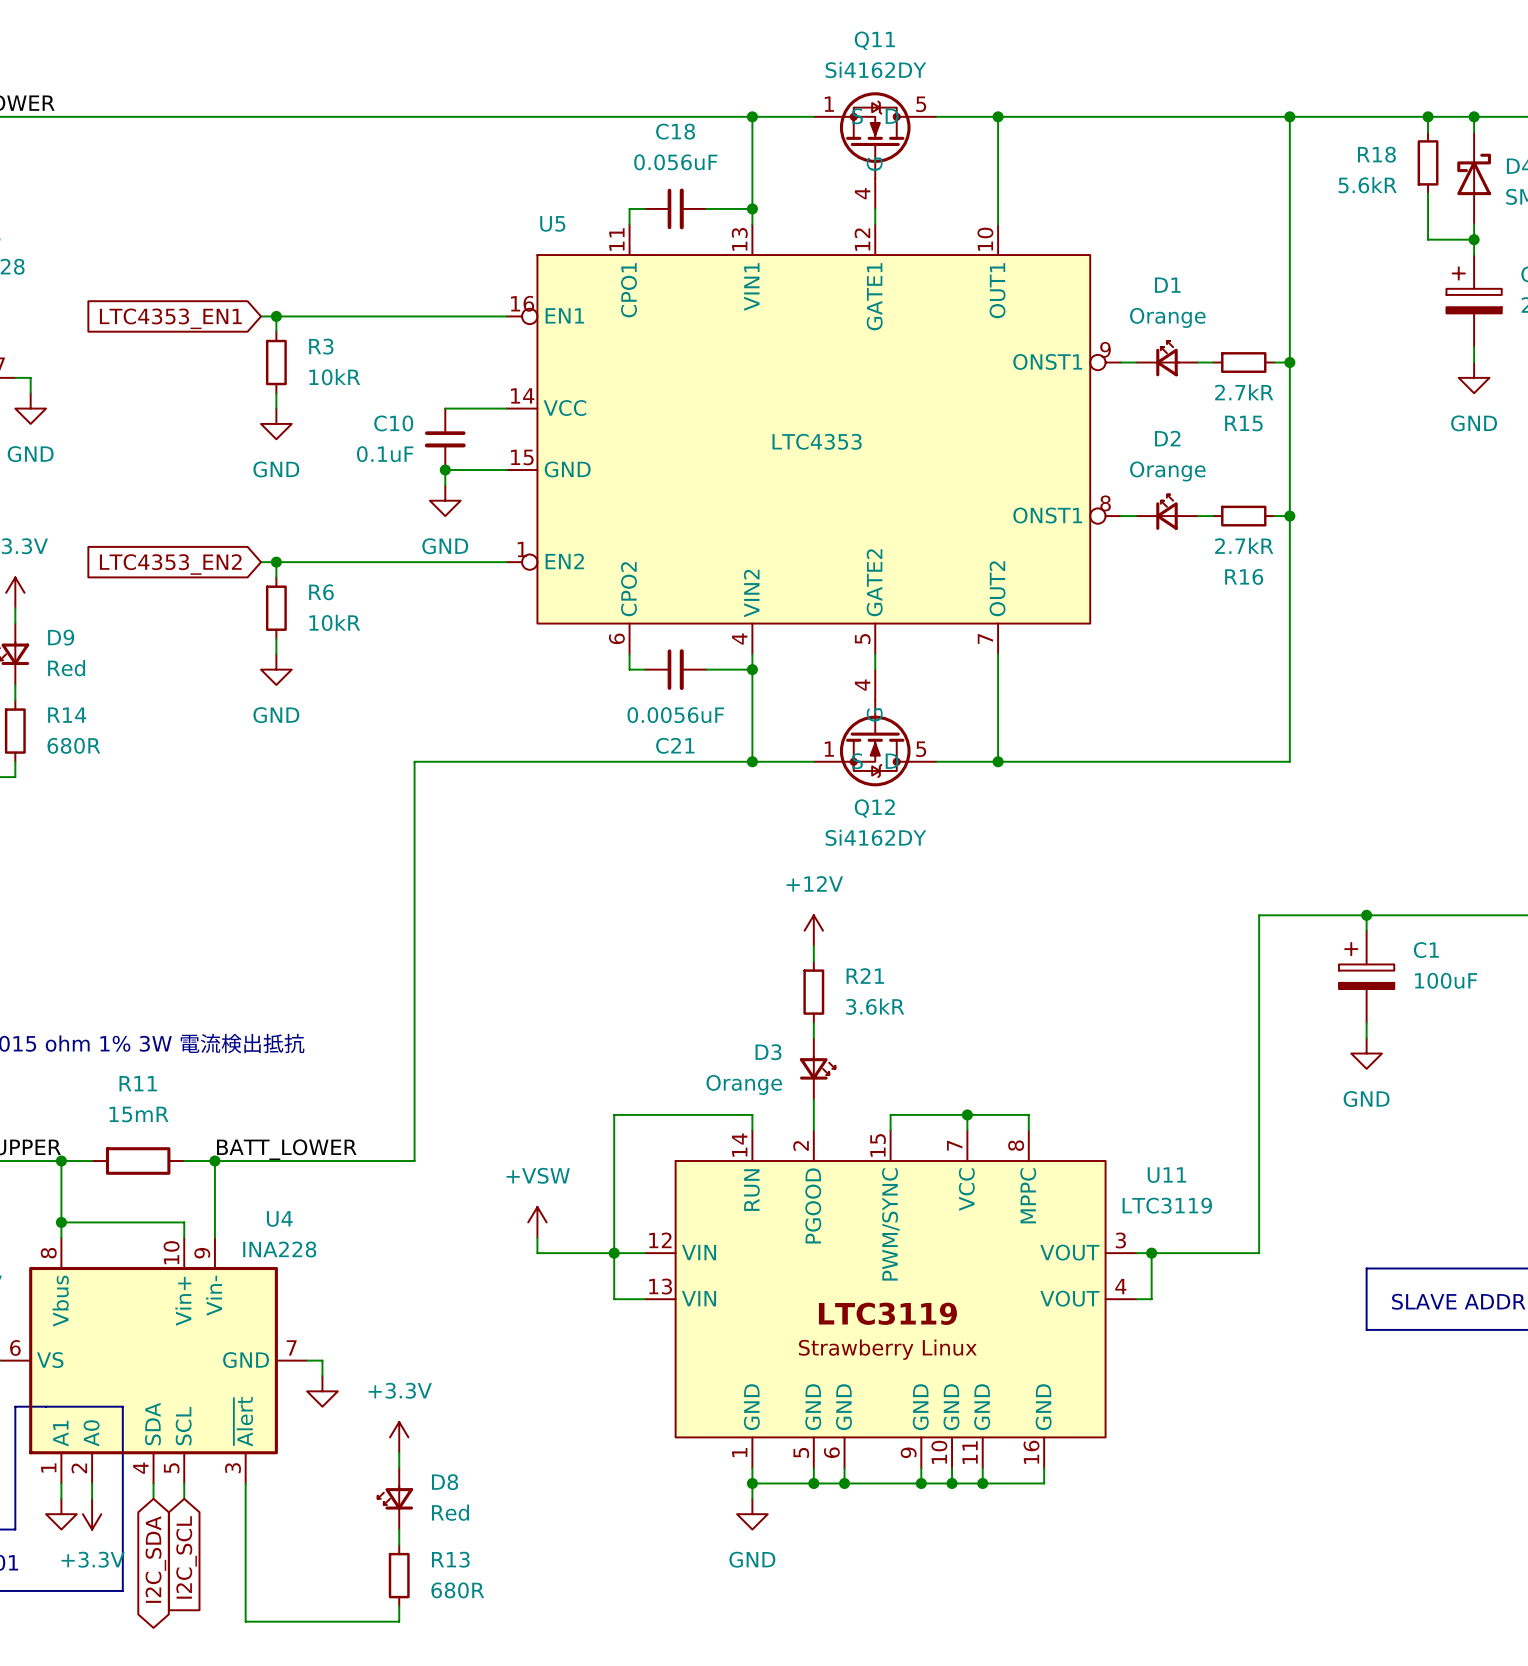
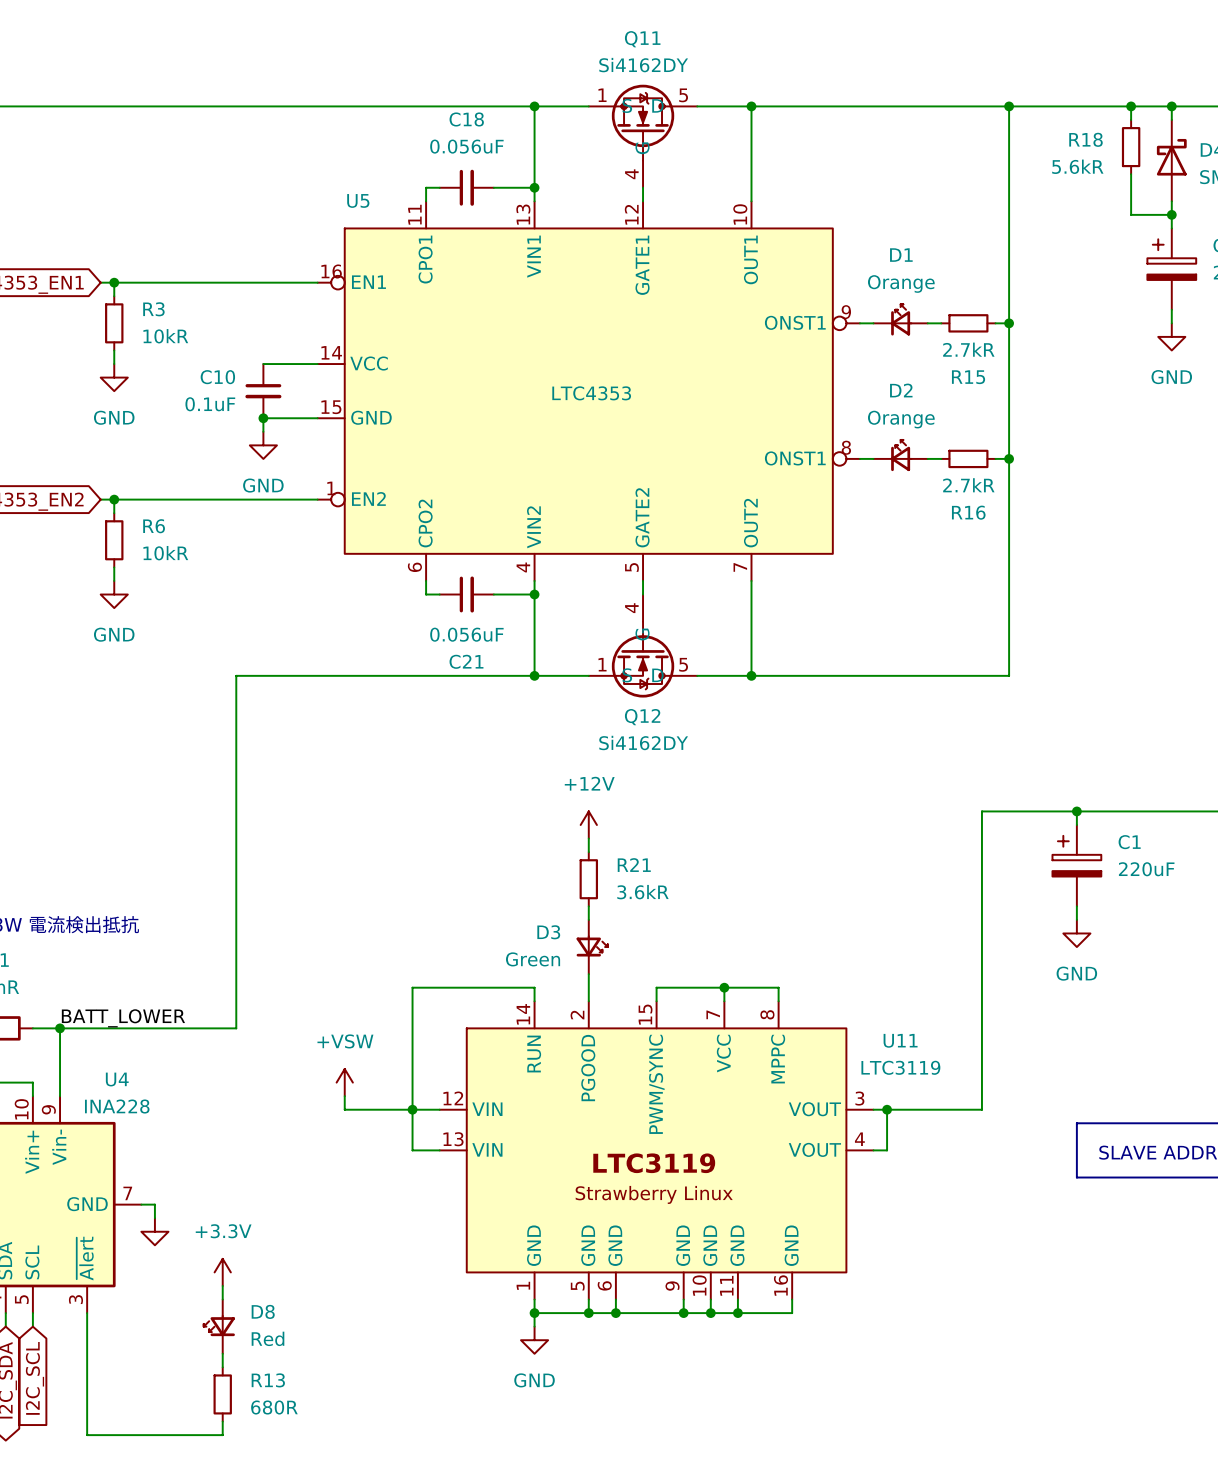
C21 value: 0.0056uF (675, 715) -> 0.056uF (466, 634)
C1 value: 100uF (1446, 980) -> 220uF (1146, 869)
D3 value: Orange (744, 1084) -> Green (533, 959)

